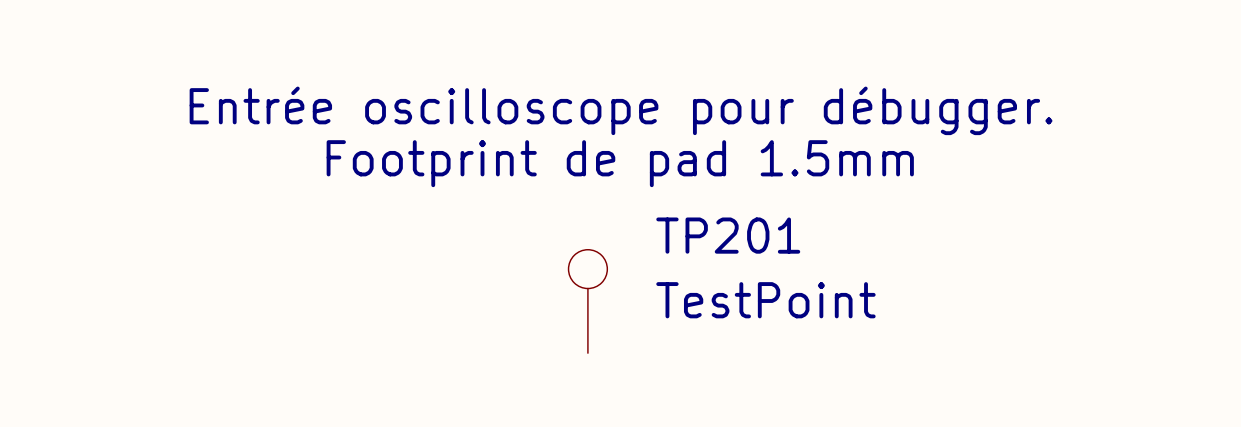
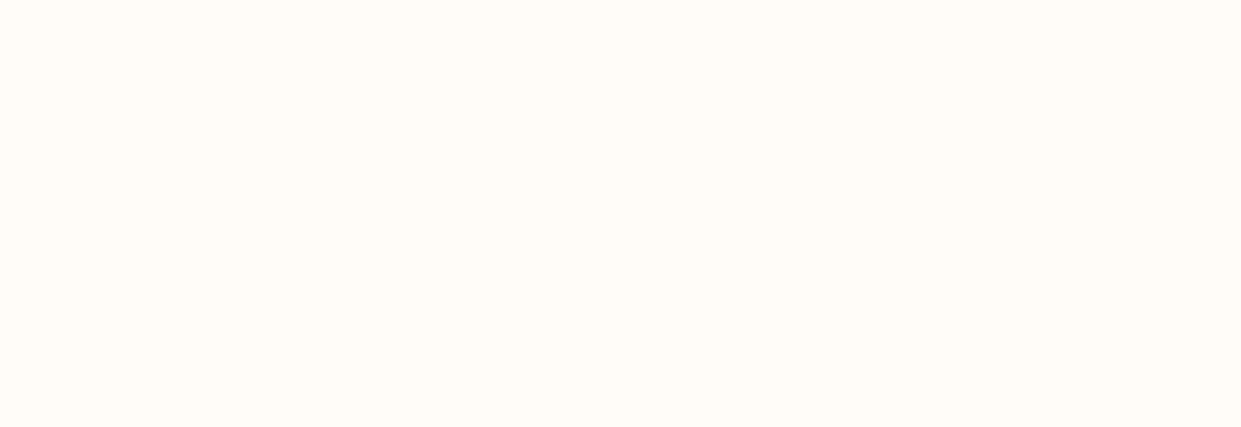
text: Entrée oscilloscope pour débugger. (621, 110) -> none
text: Footprint de pad 1.5mm (620, 163) -> none
TP201: TestPoint (587, 301) -> none

